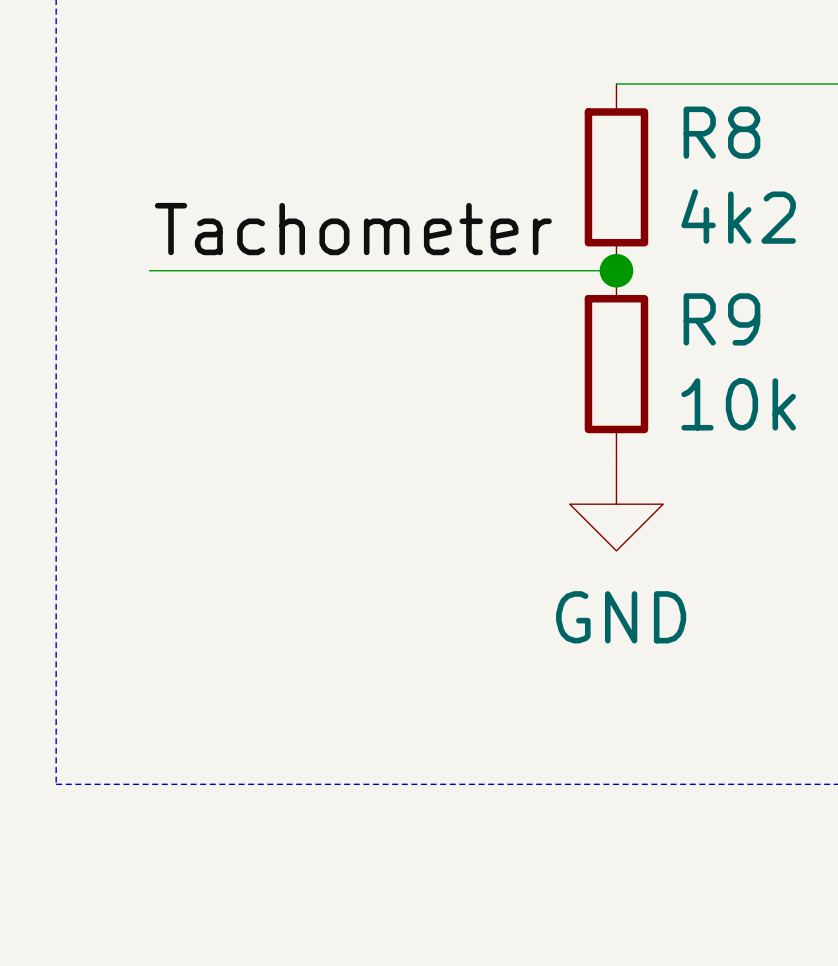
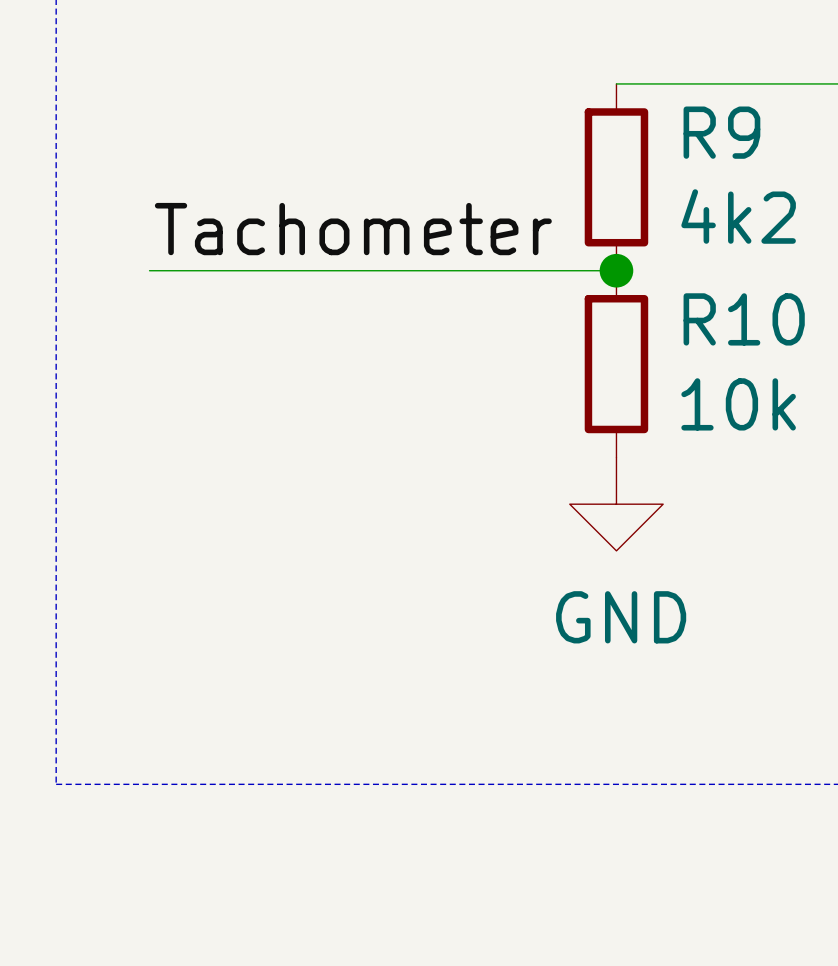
R8 name: R8 (721, 132) -> R9 (721, 132)
R9 name: R9 (721, 319) -> R10 (744, 319)

